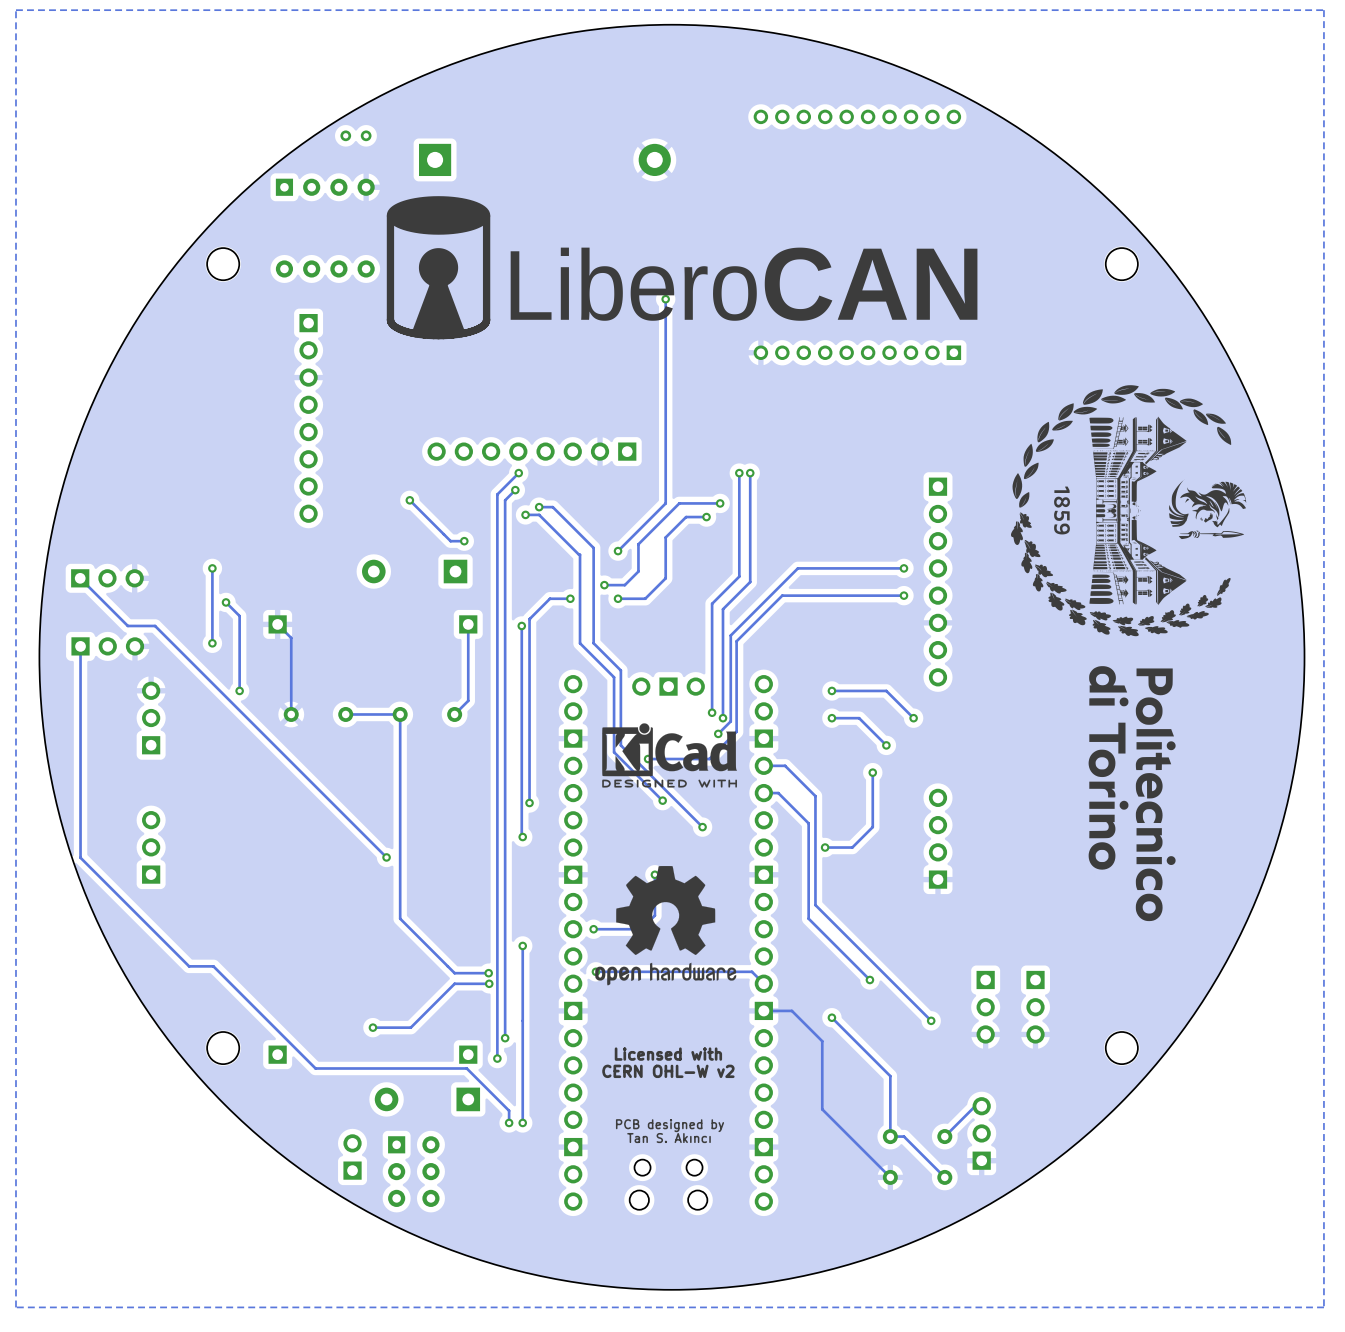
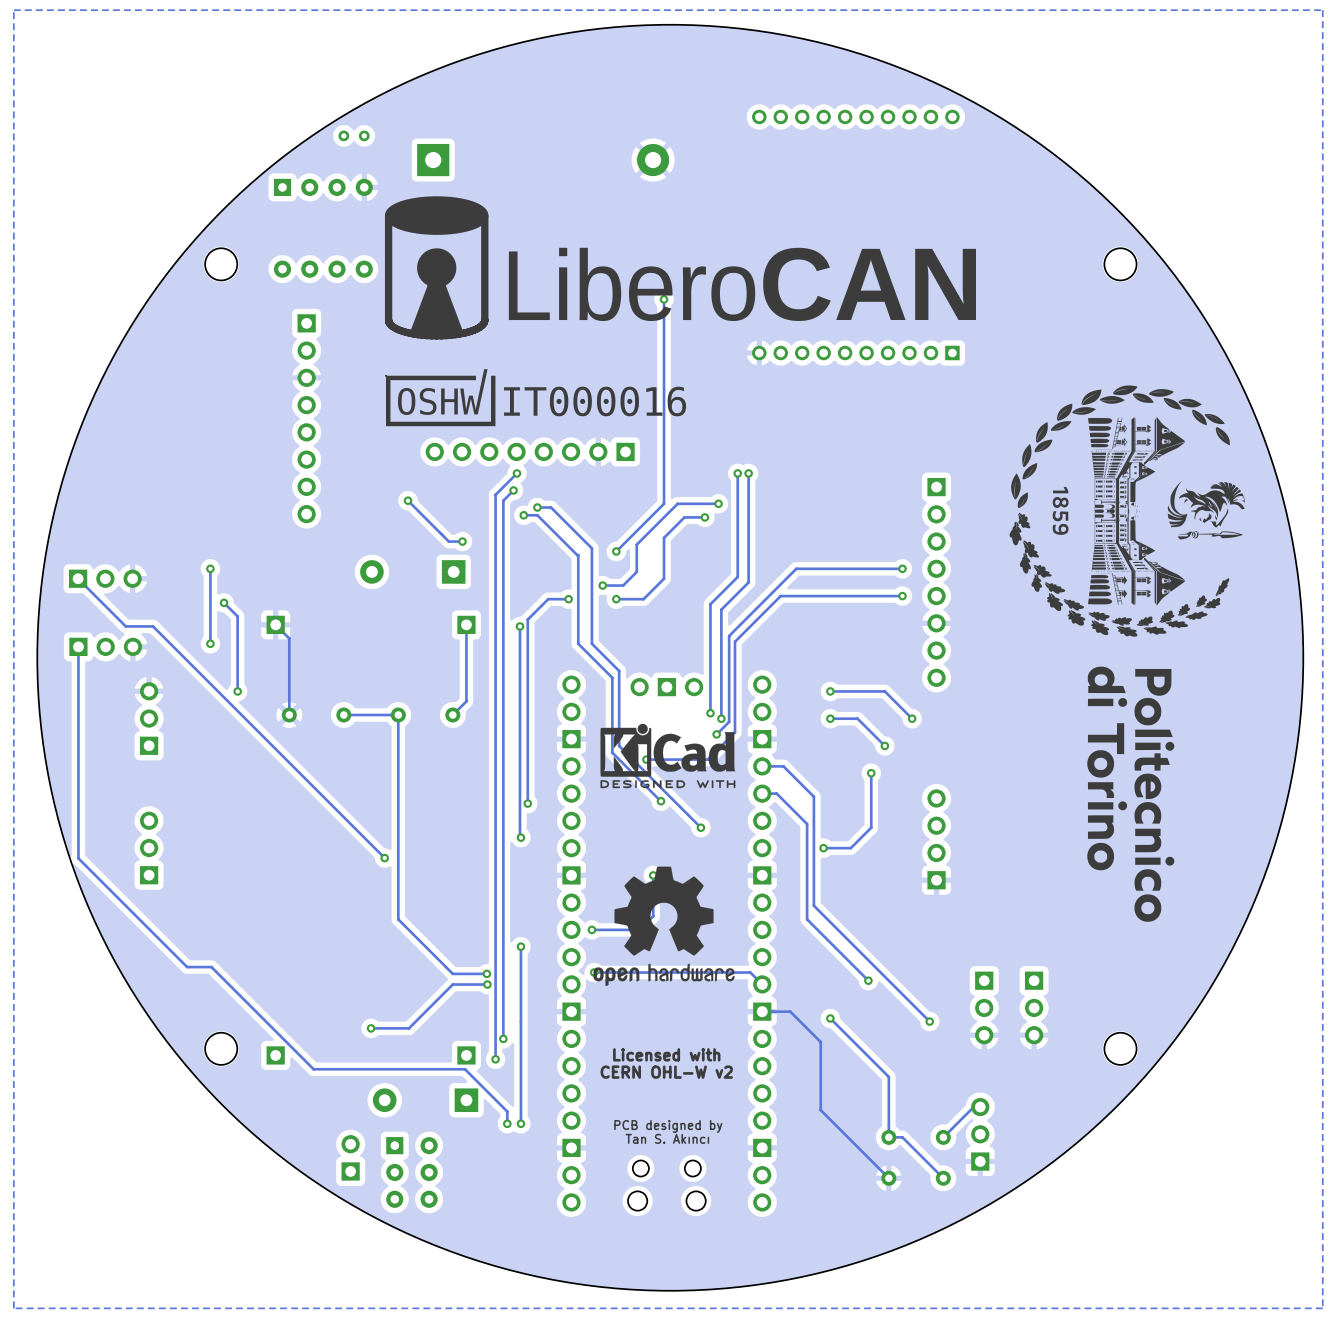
drawing: none -> [386, 369, 687, 427]

